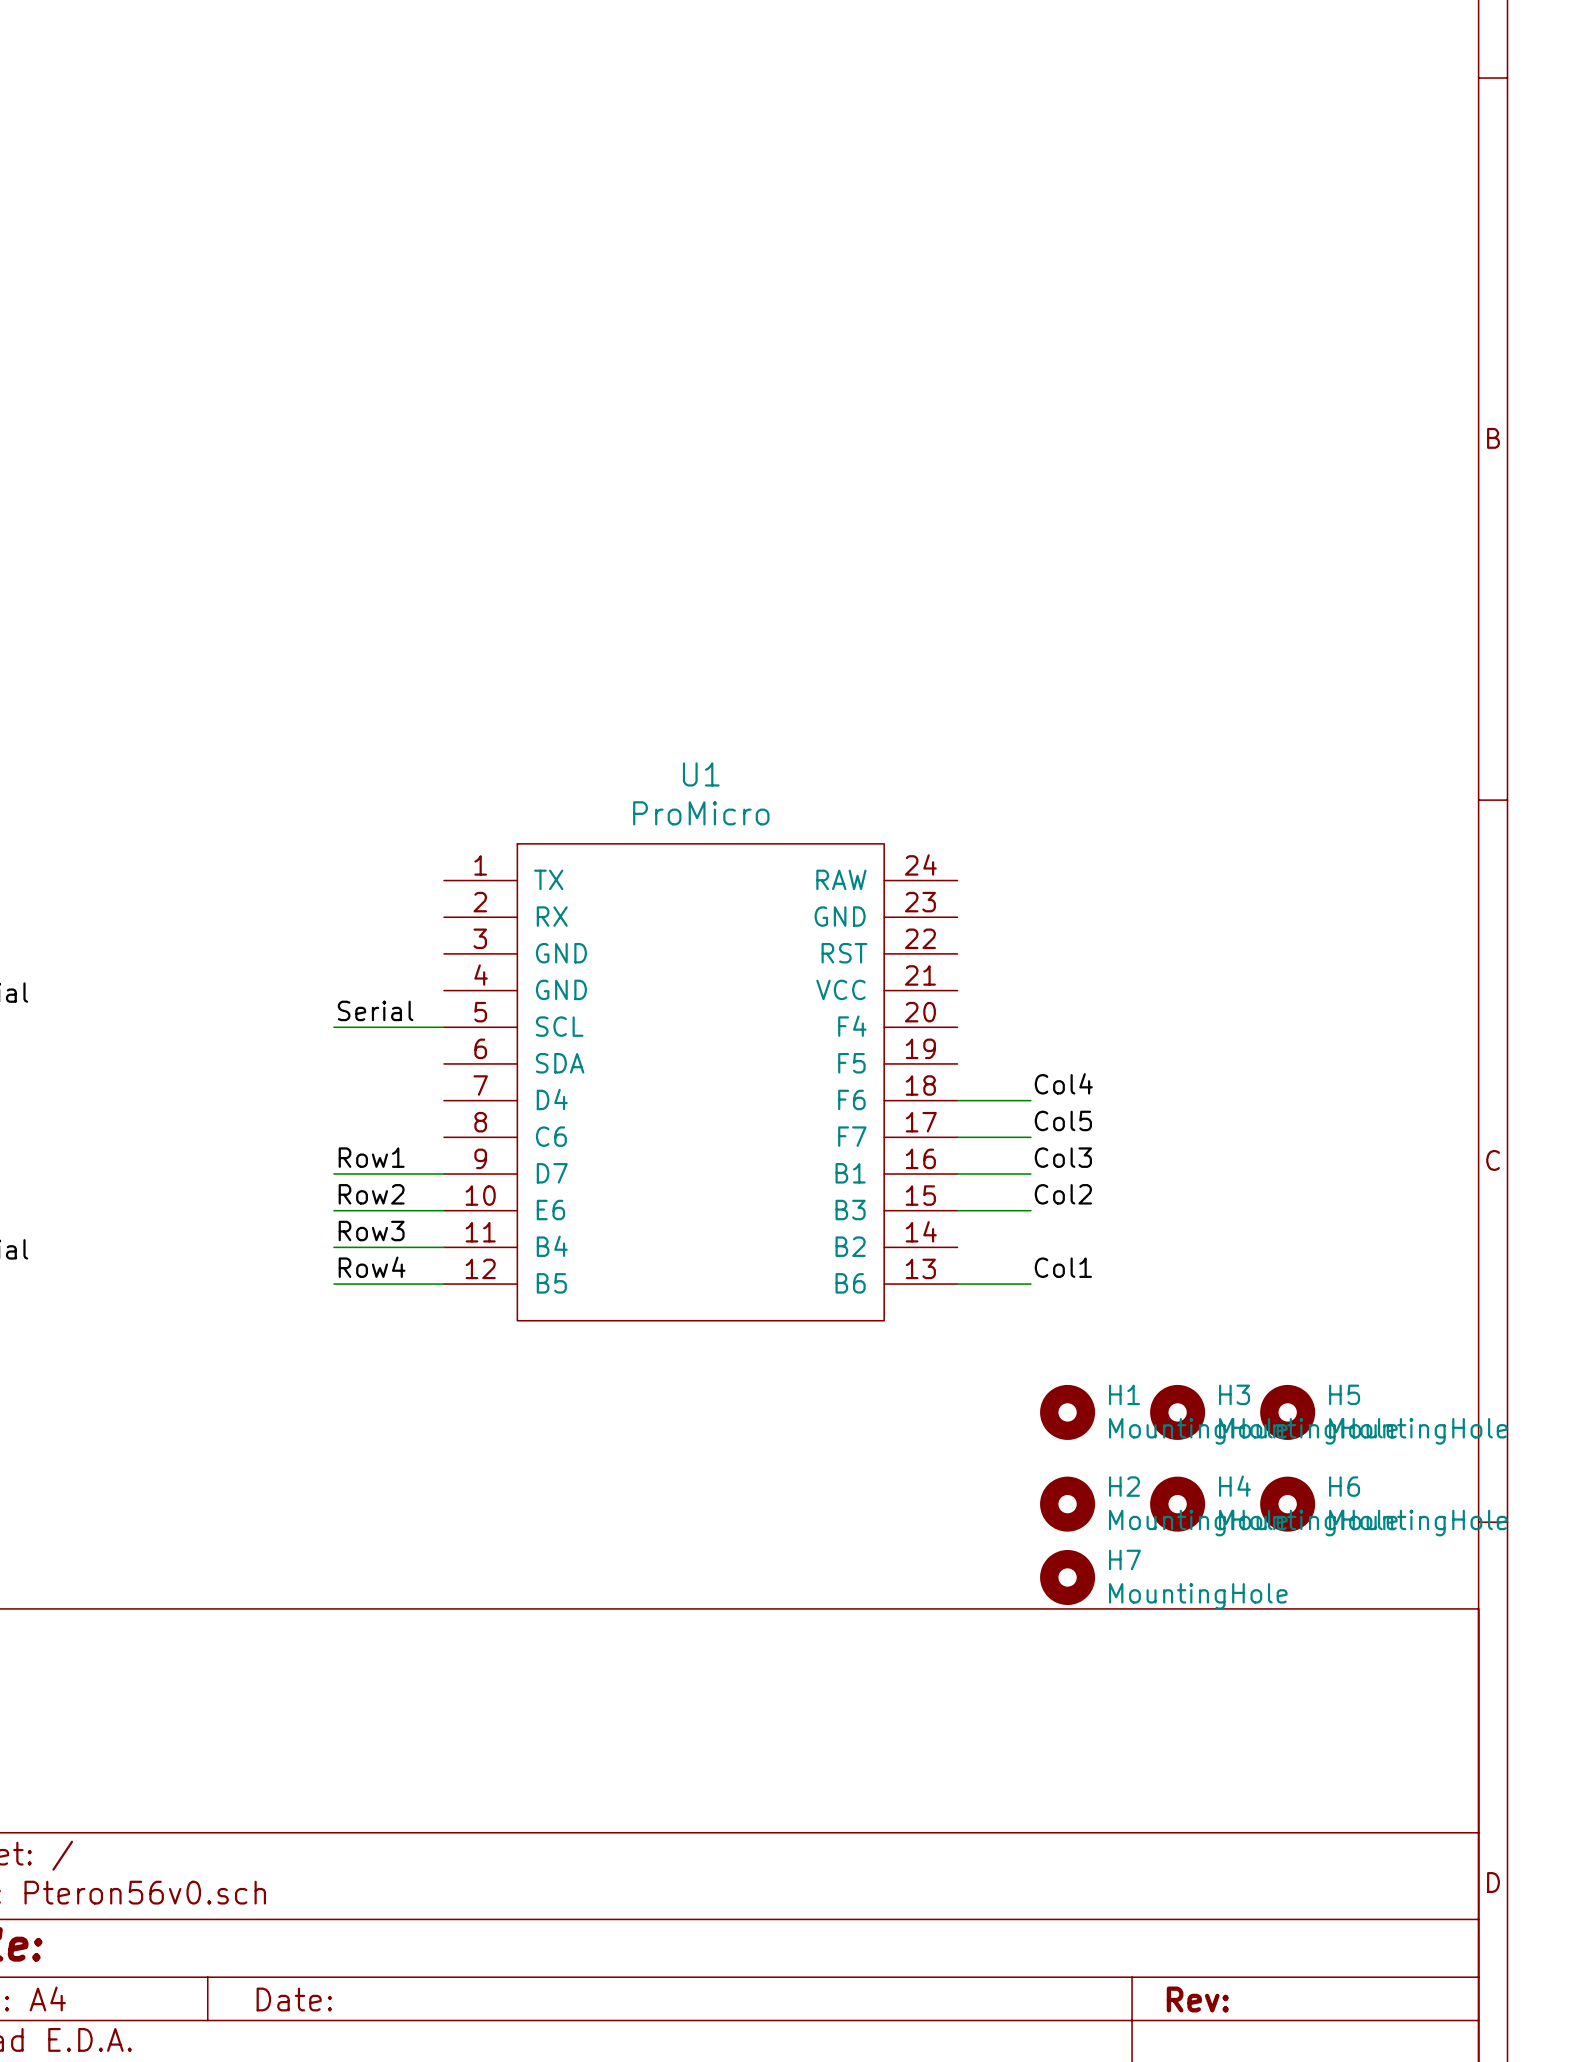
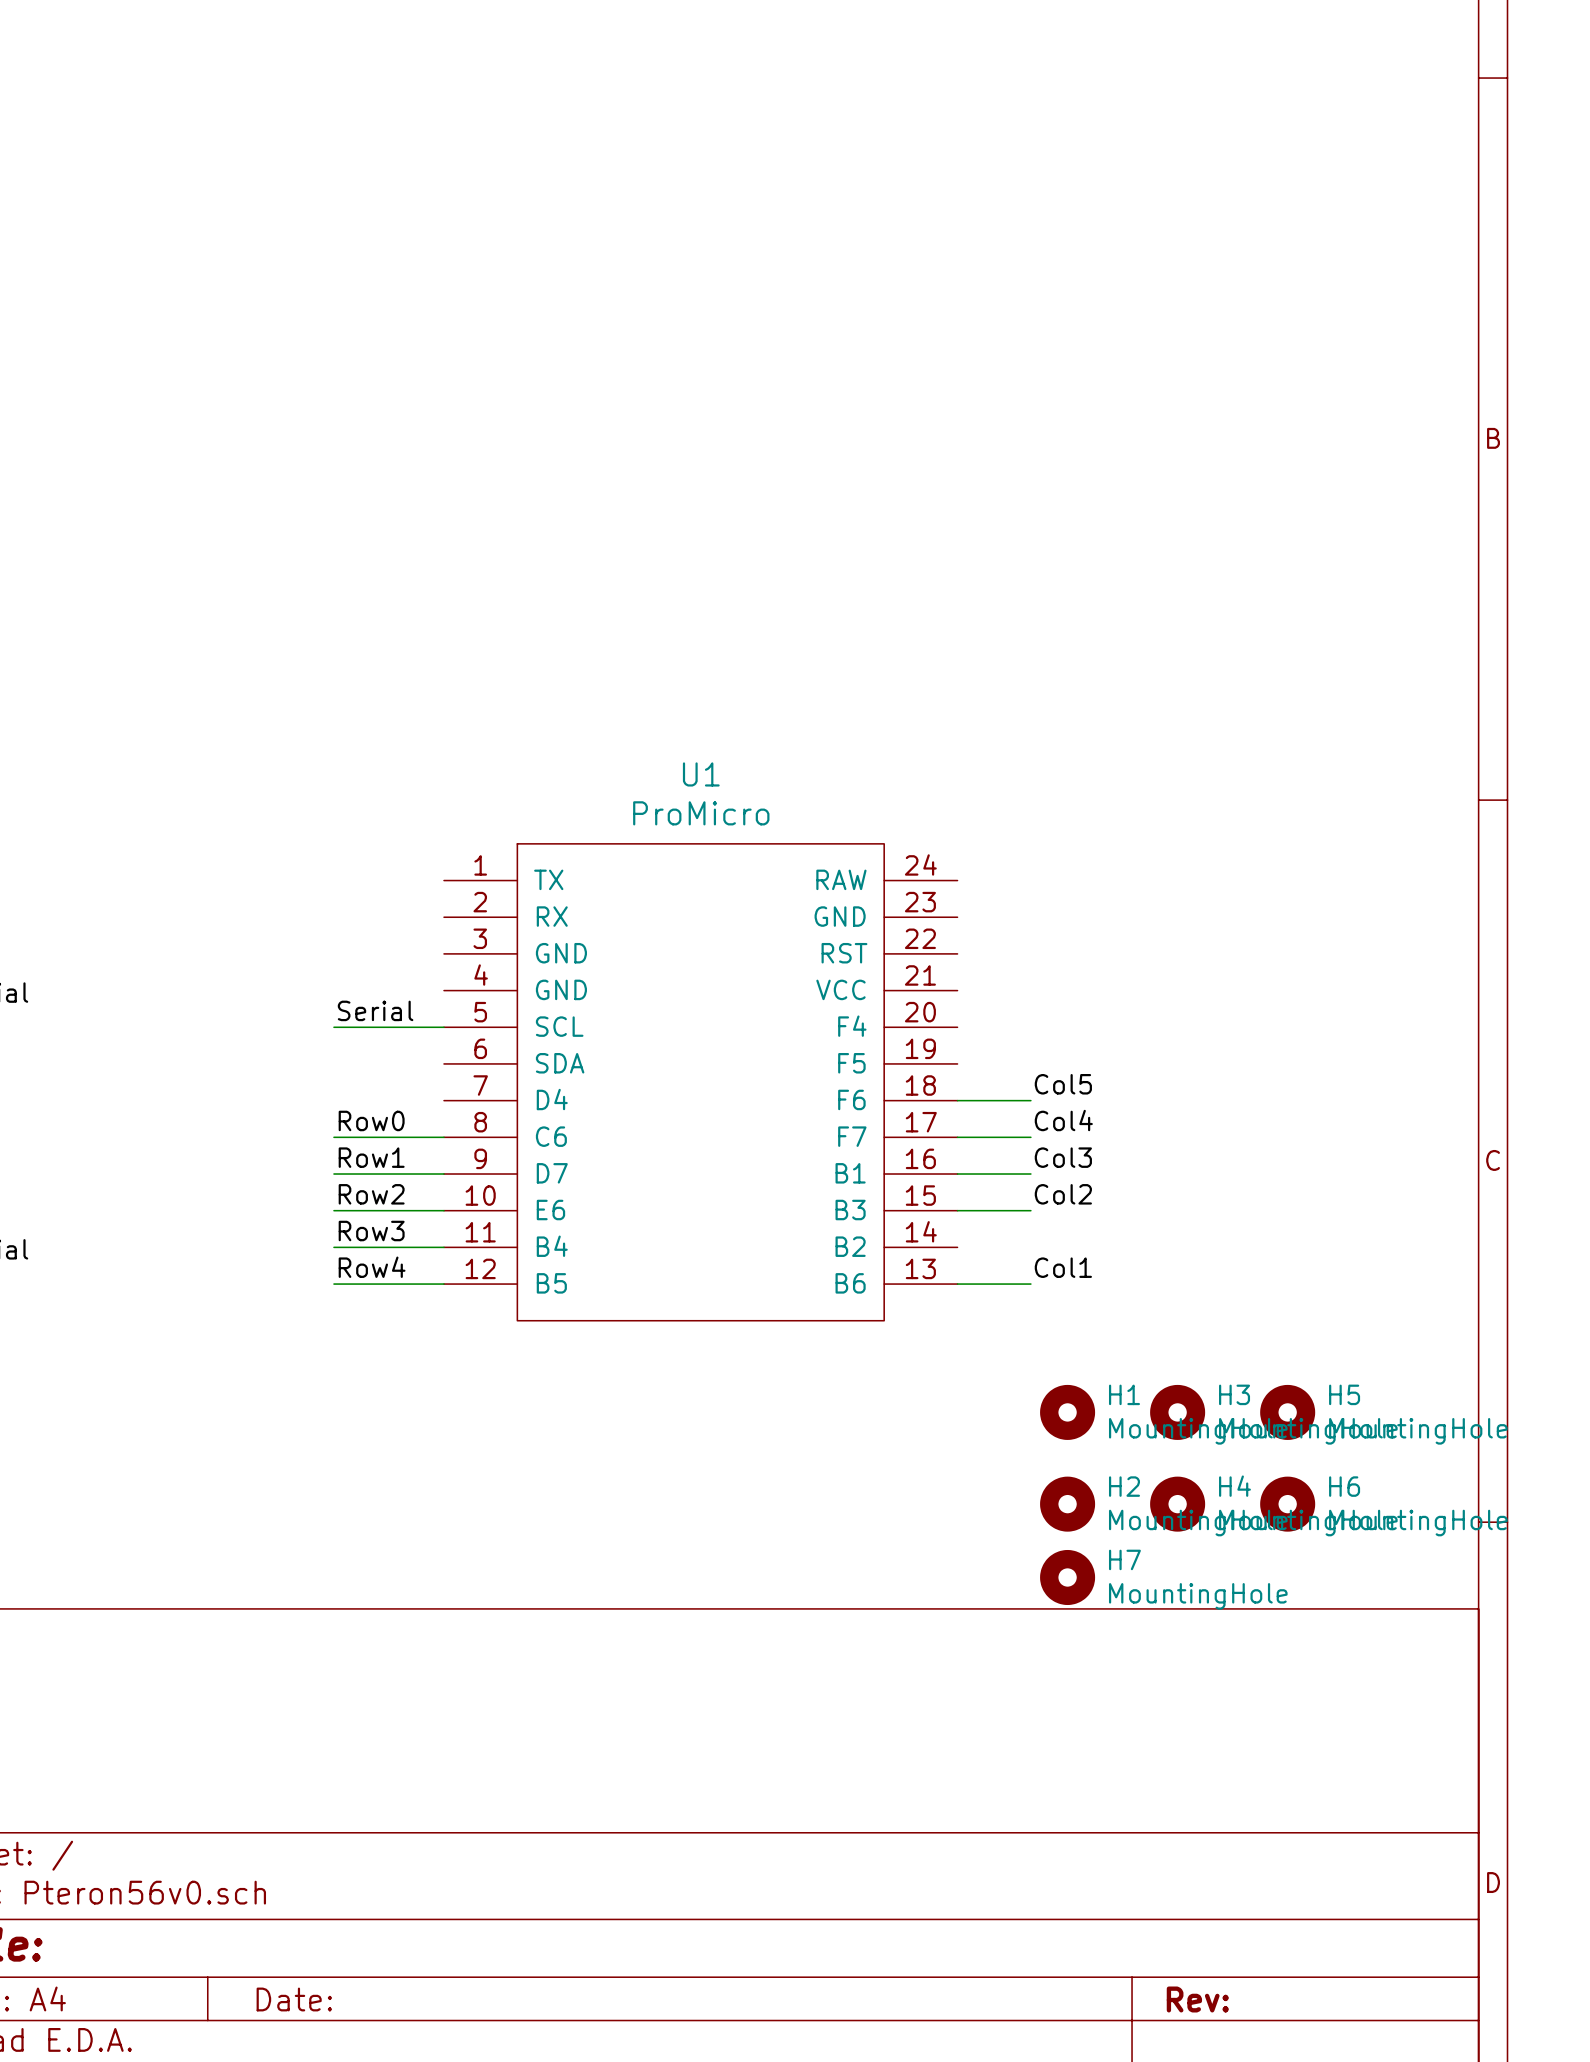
label: Col4 (1063, 1083) -> Col5 (1063, 1084)
label: none -> Row0 (371, 1120)
label: Col5 (1063, 1120) -> Col4 (1063, 1120)
wire: none -> (333, 1137) (444, 1137)

